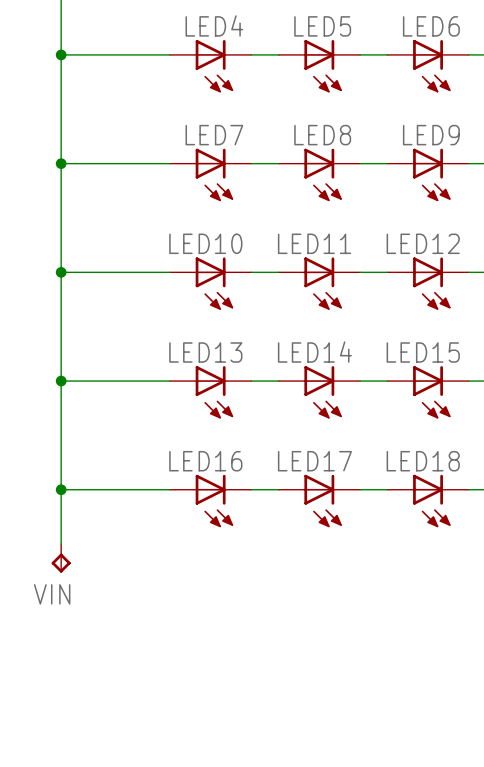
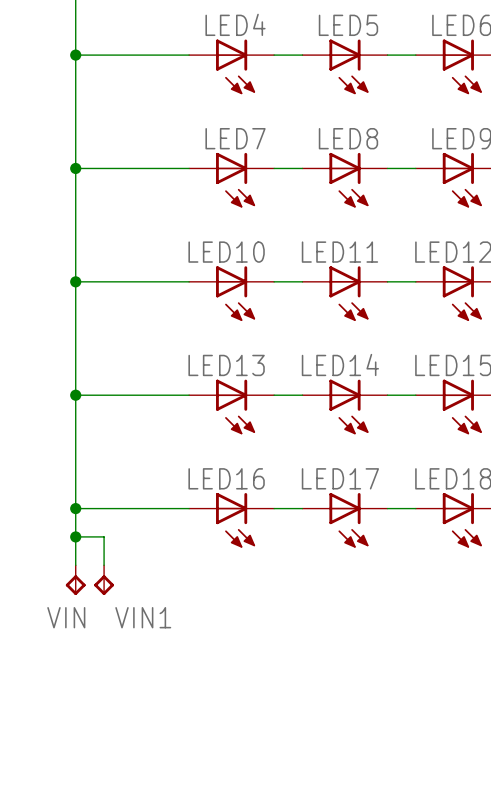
wire: none -> (75, 536) (104, 536) (104, 565)
junction: none -> (75, 536)
VIN1: none -> (104, 580)

